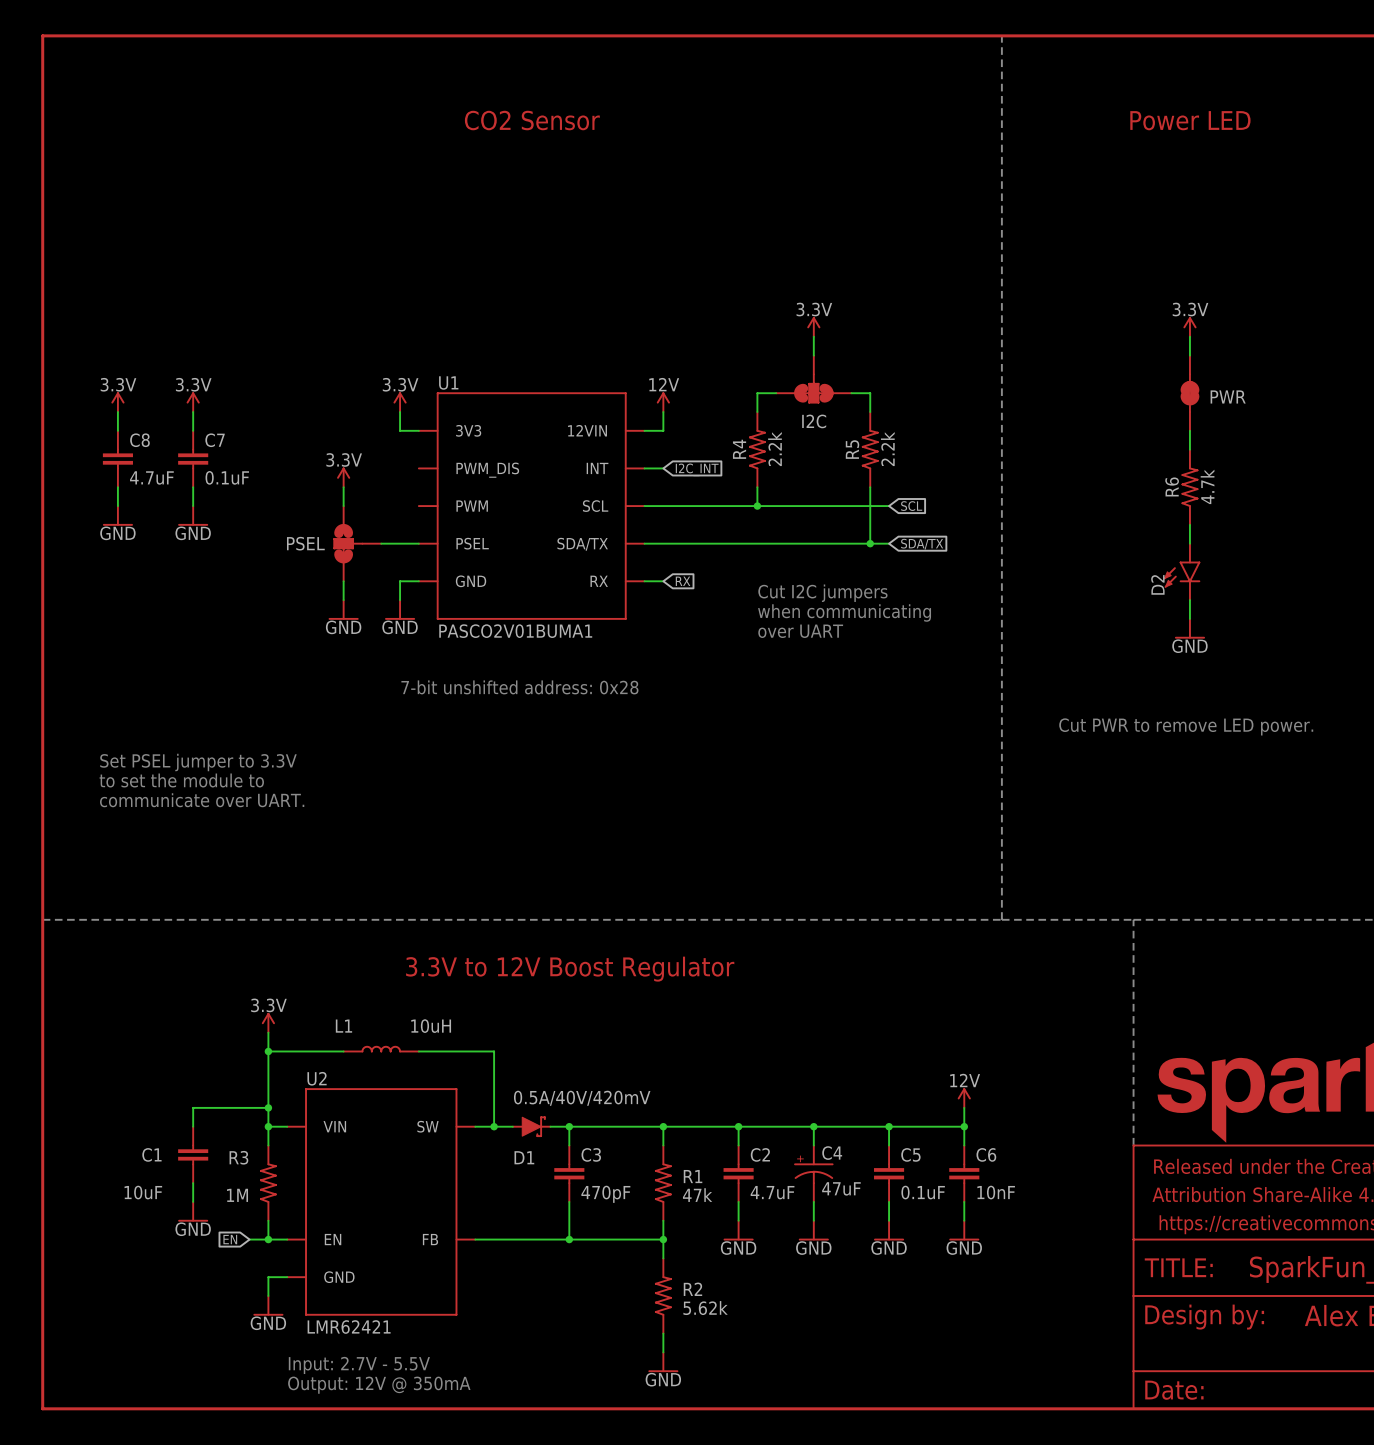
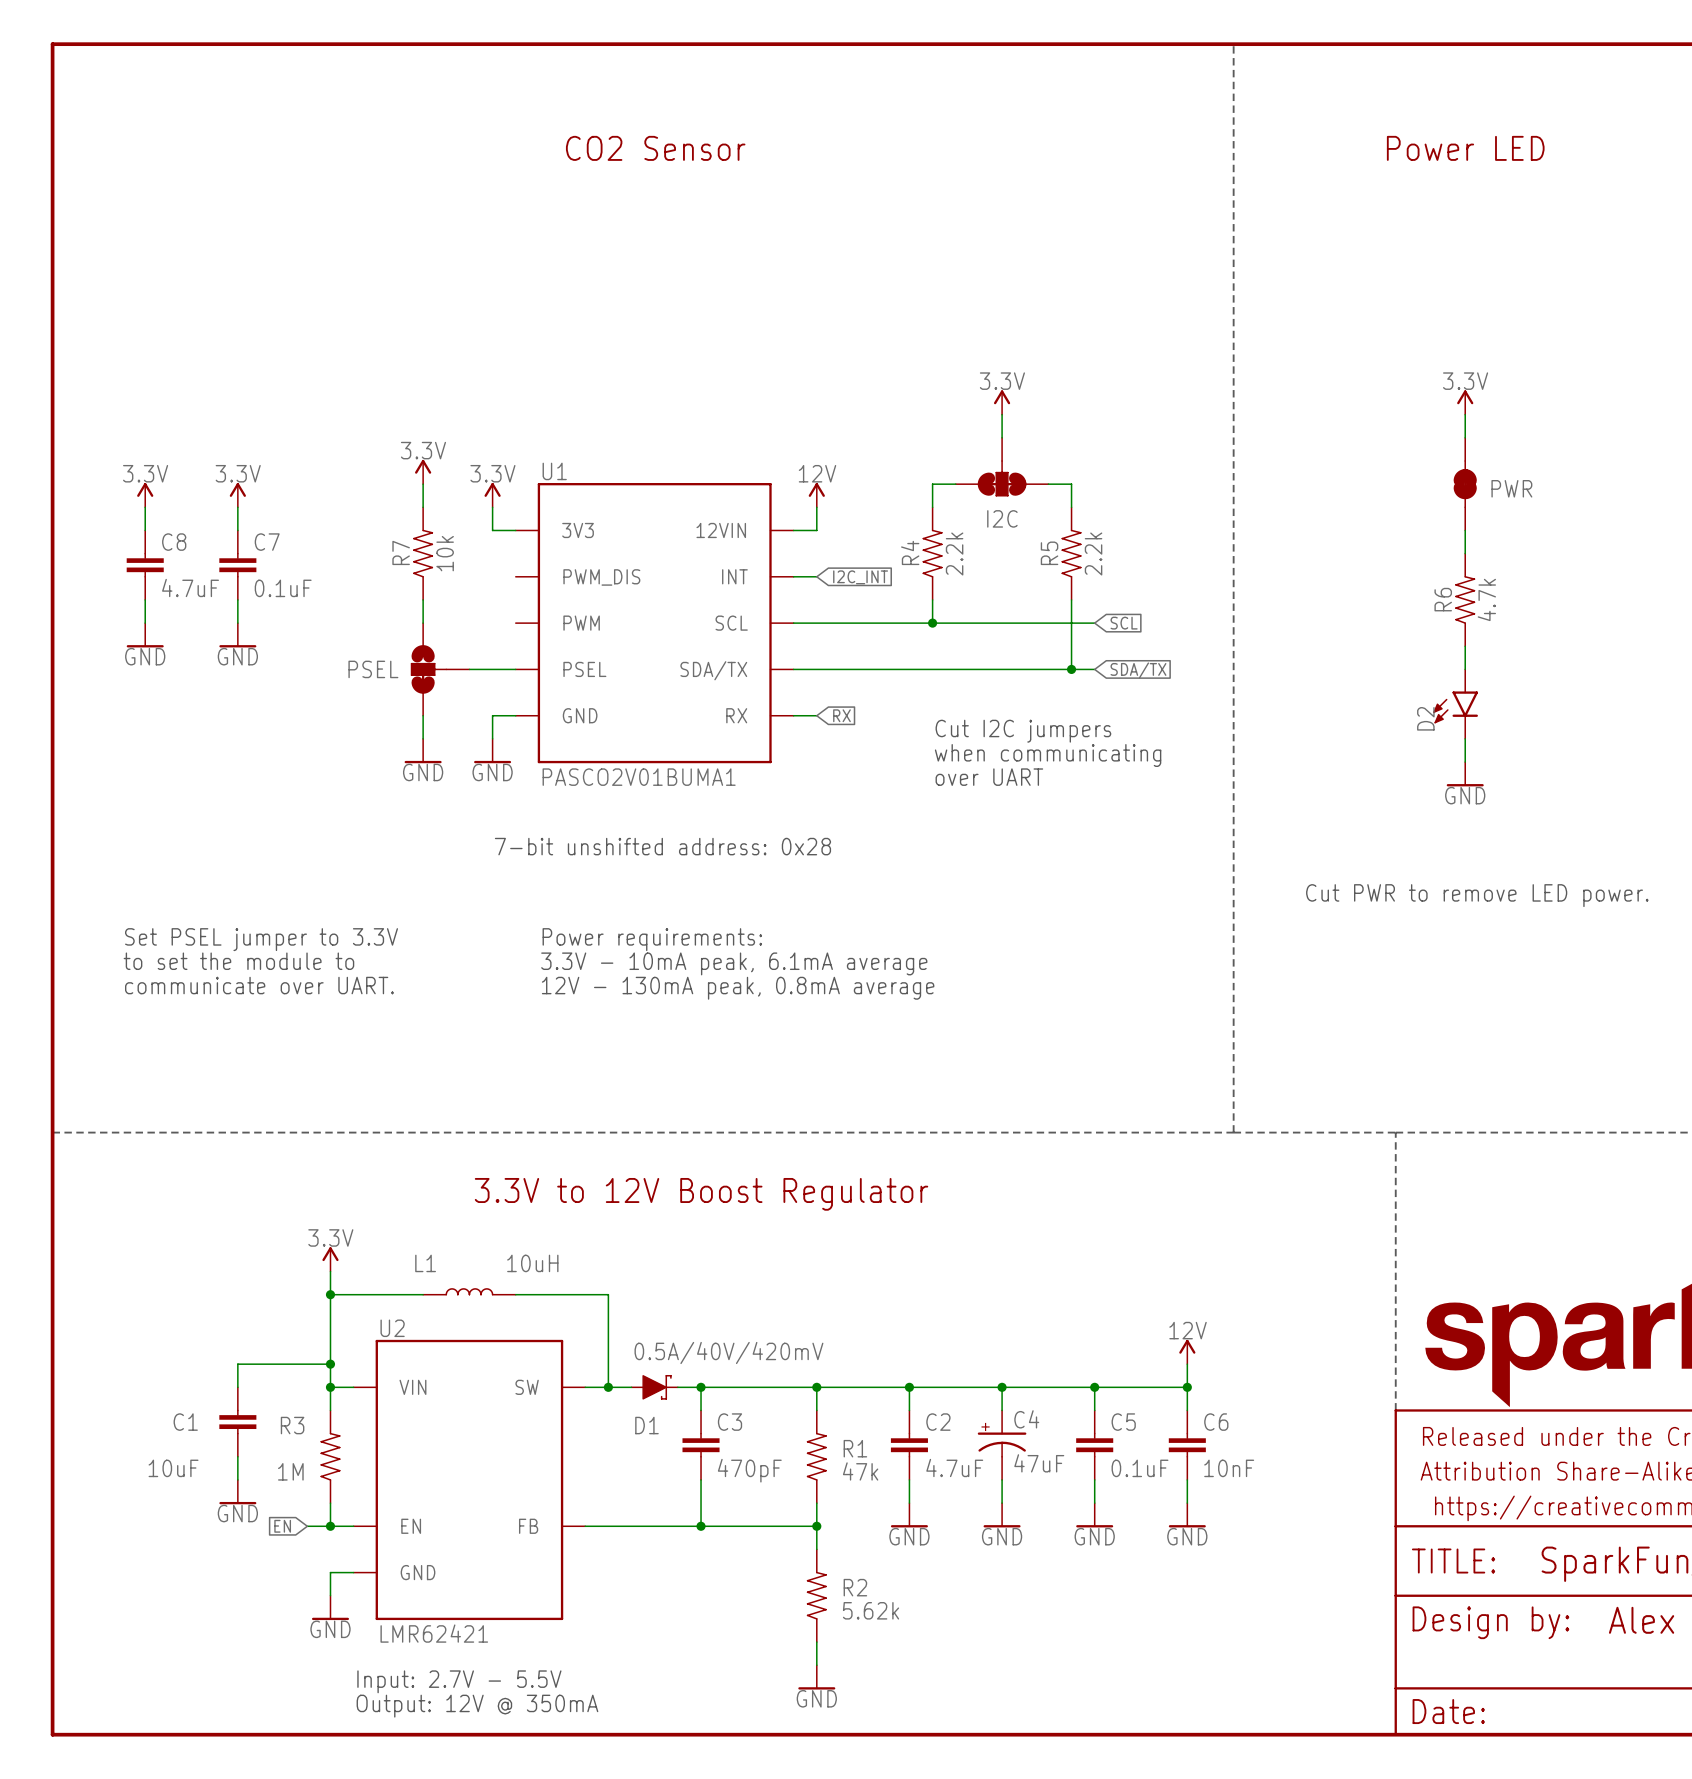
wire: none -> (423, 484) (423, 507)
R7: none -> 10k (423, 553)
power symbol position: 3.3V (343, 477) -> 3.3V (423, 472)
text: none -> Power requirements: (652, 939)
text: none -> 3.3V - 10mA peak, 6.1mA average (734, 963)
text: none -> 12V - 130mA peak, 0.8mA average (738, 988)

